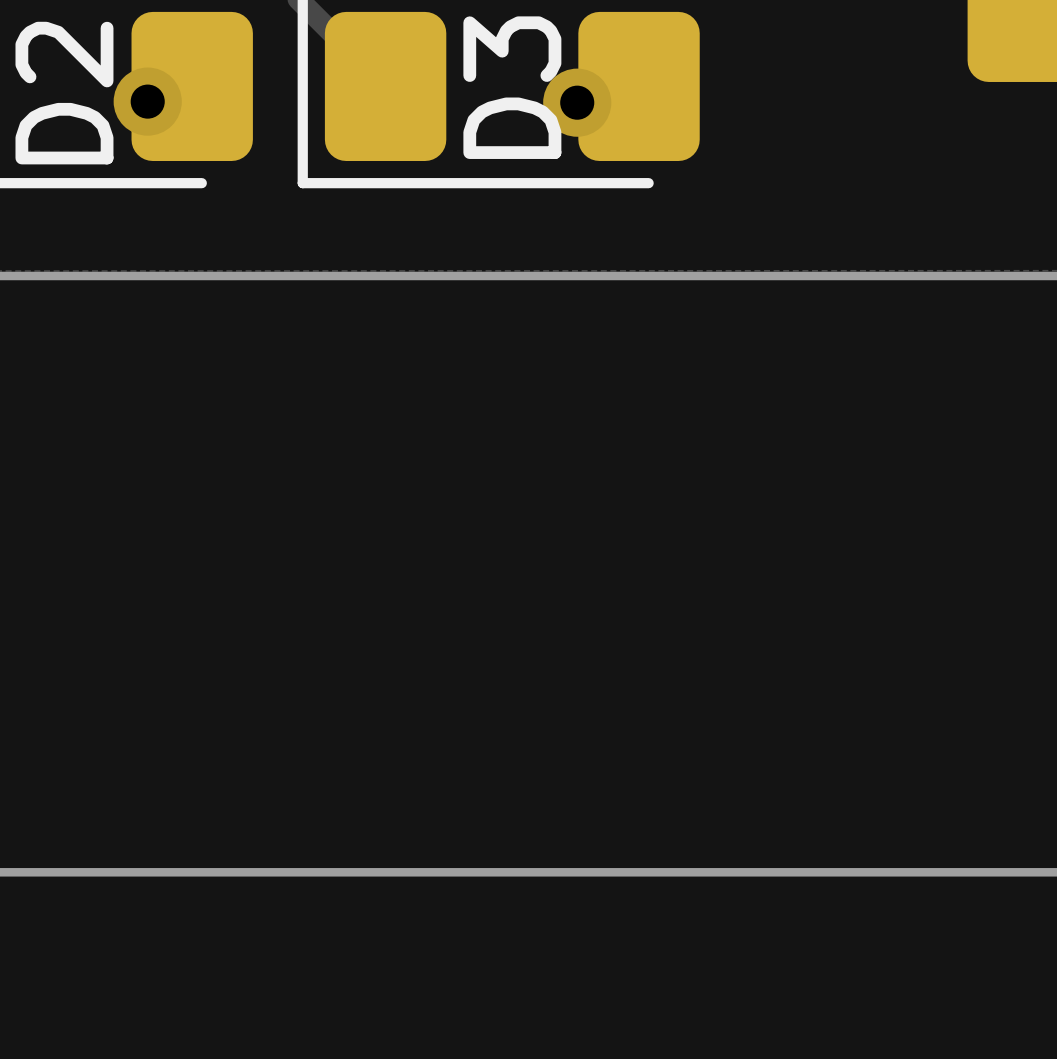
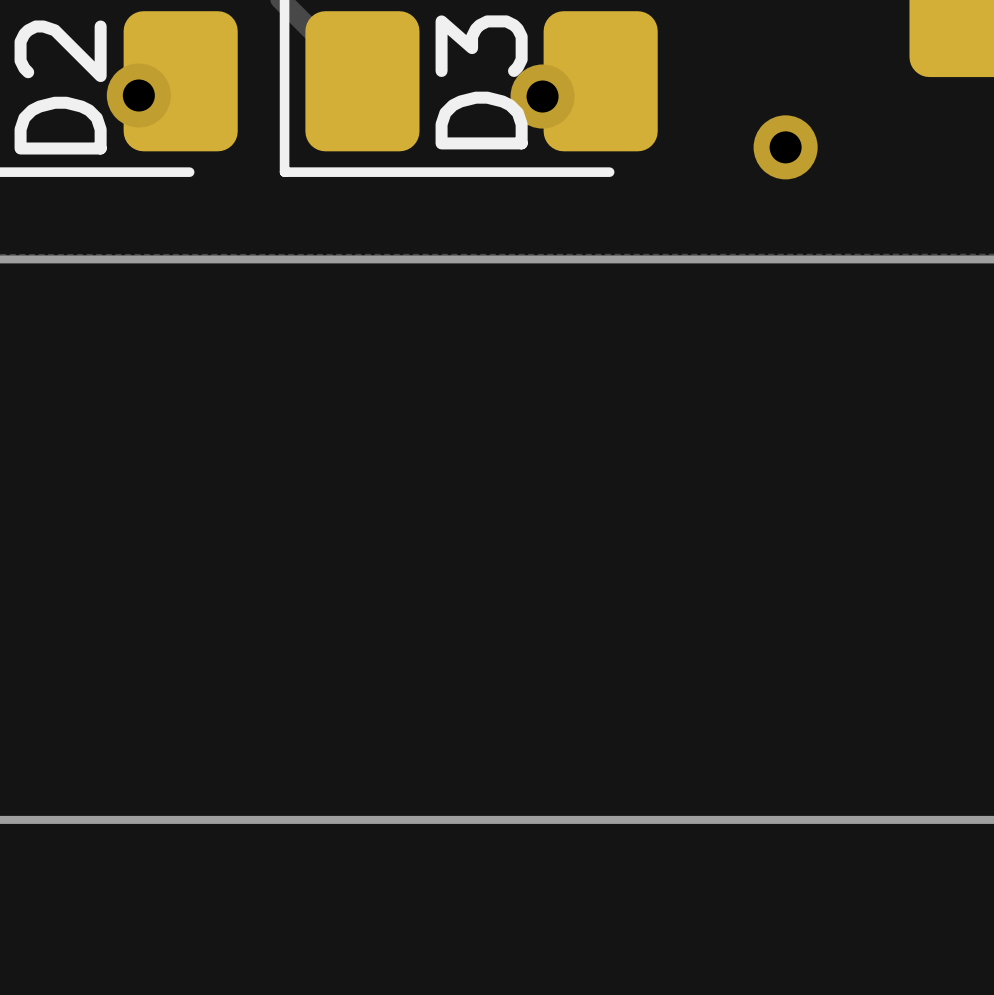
via: none -> (785, 147)

